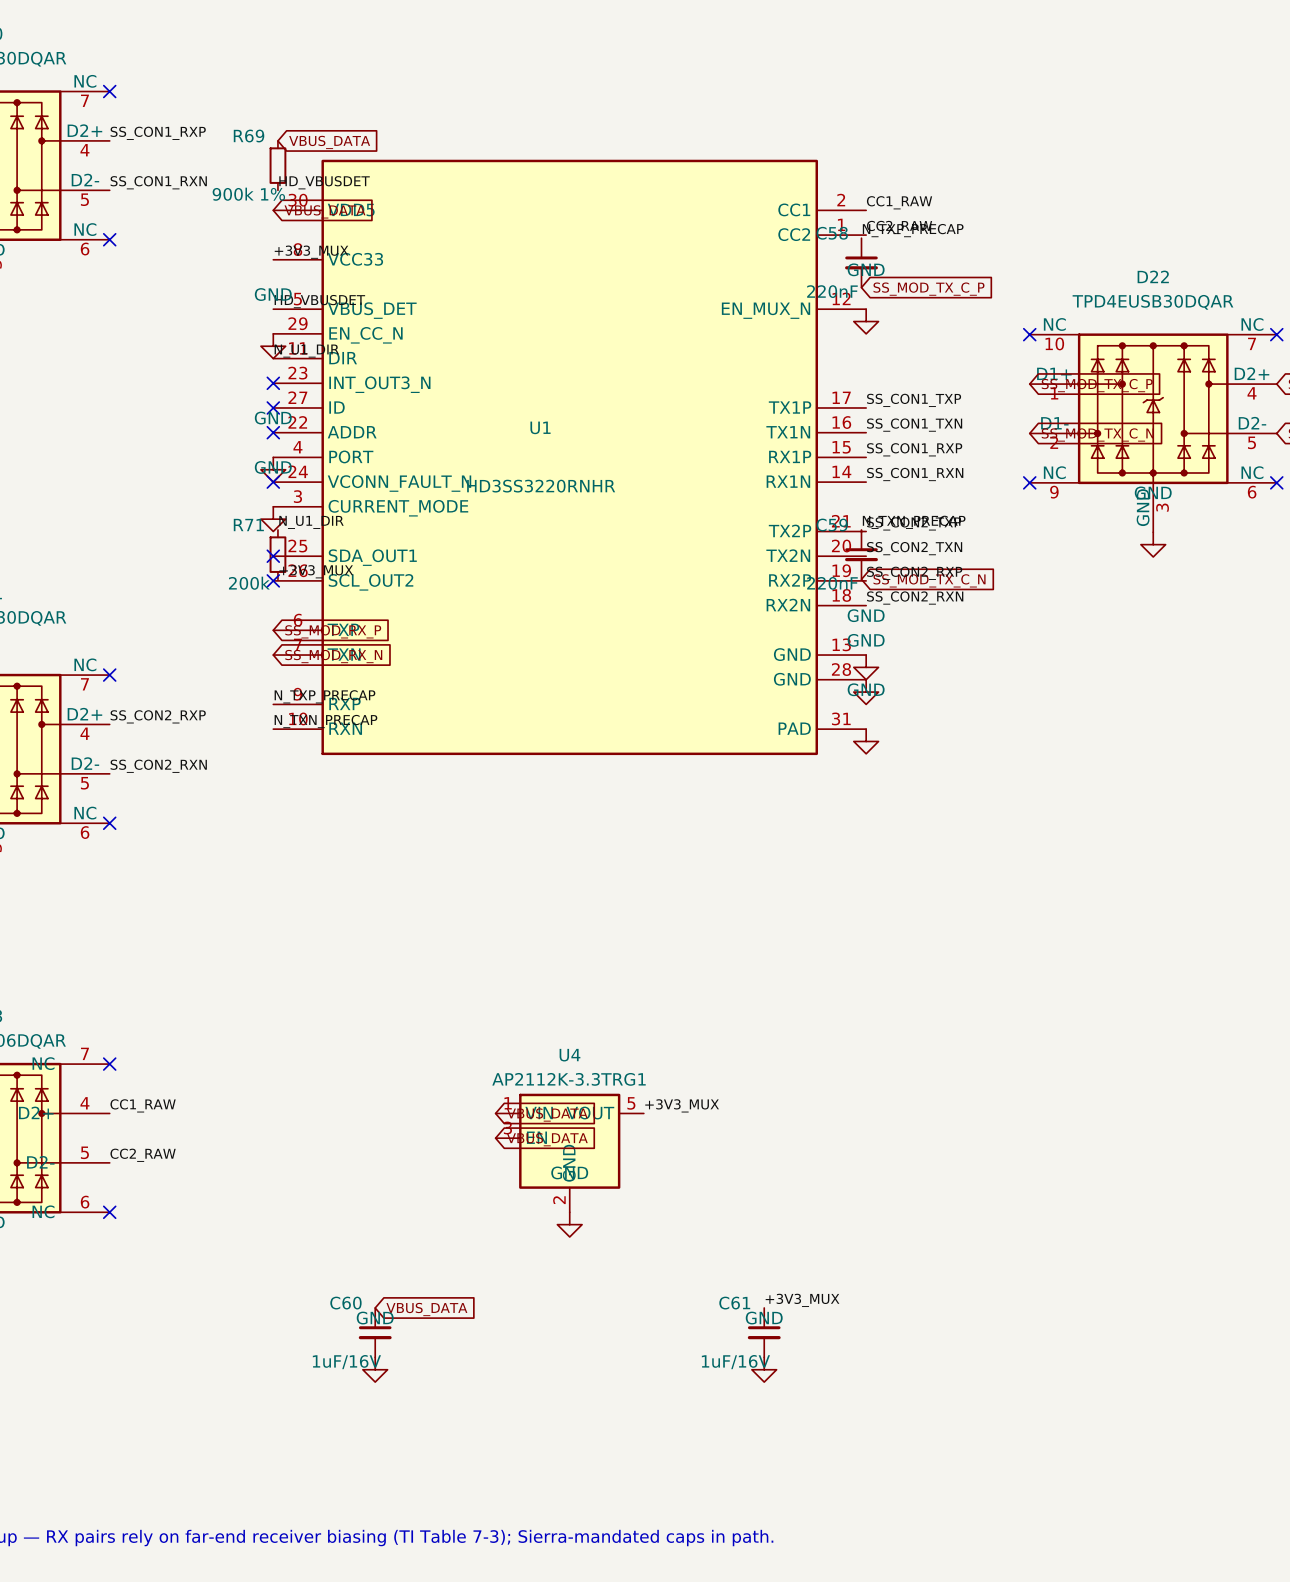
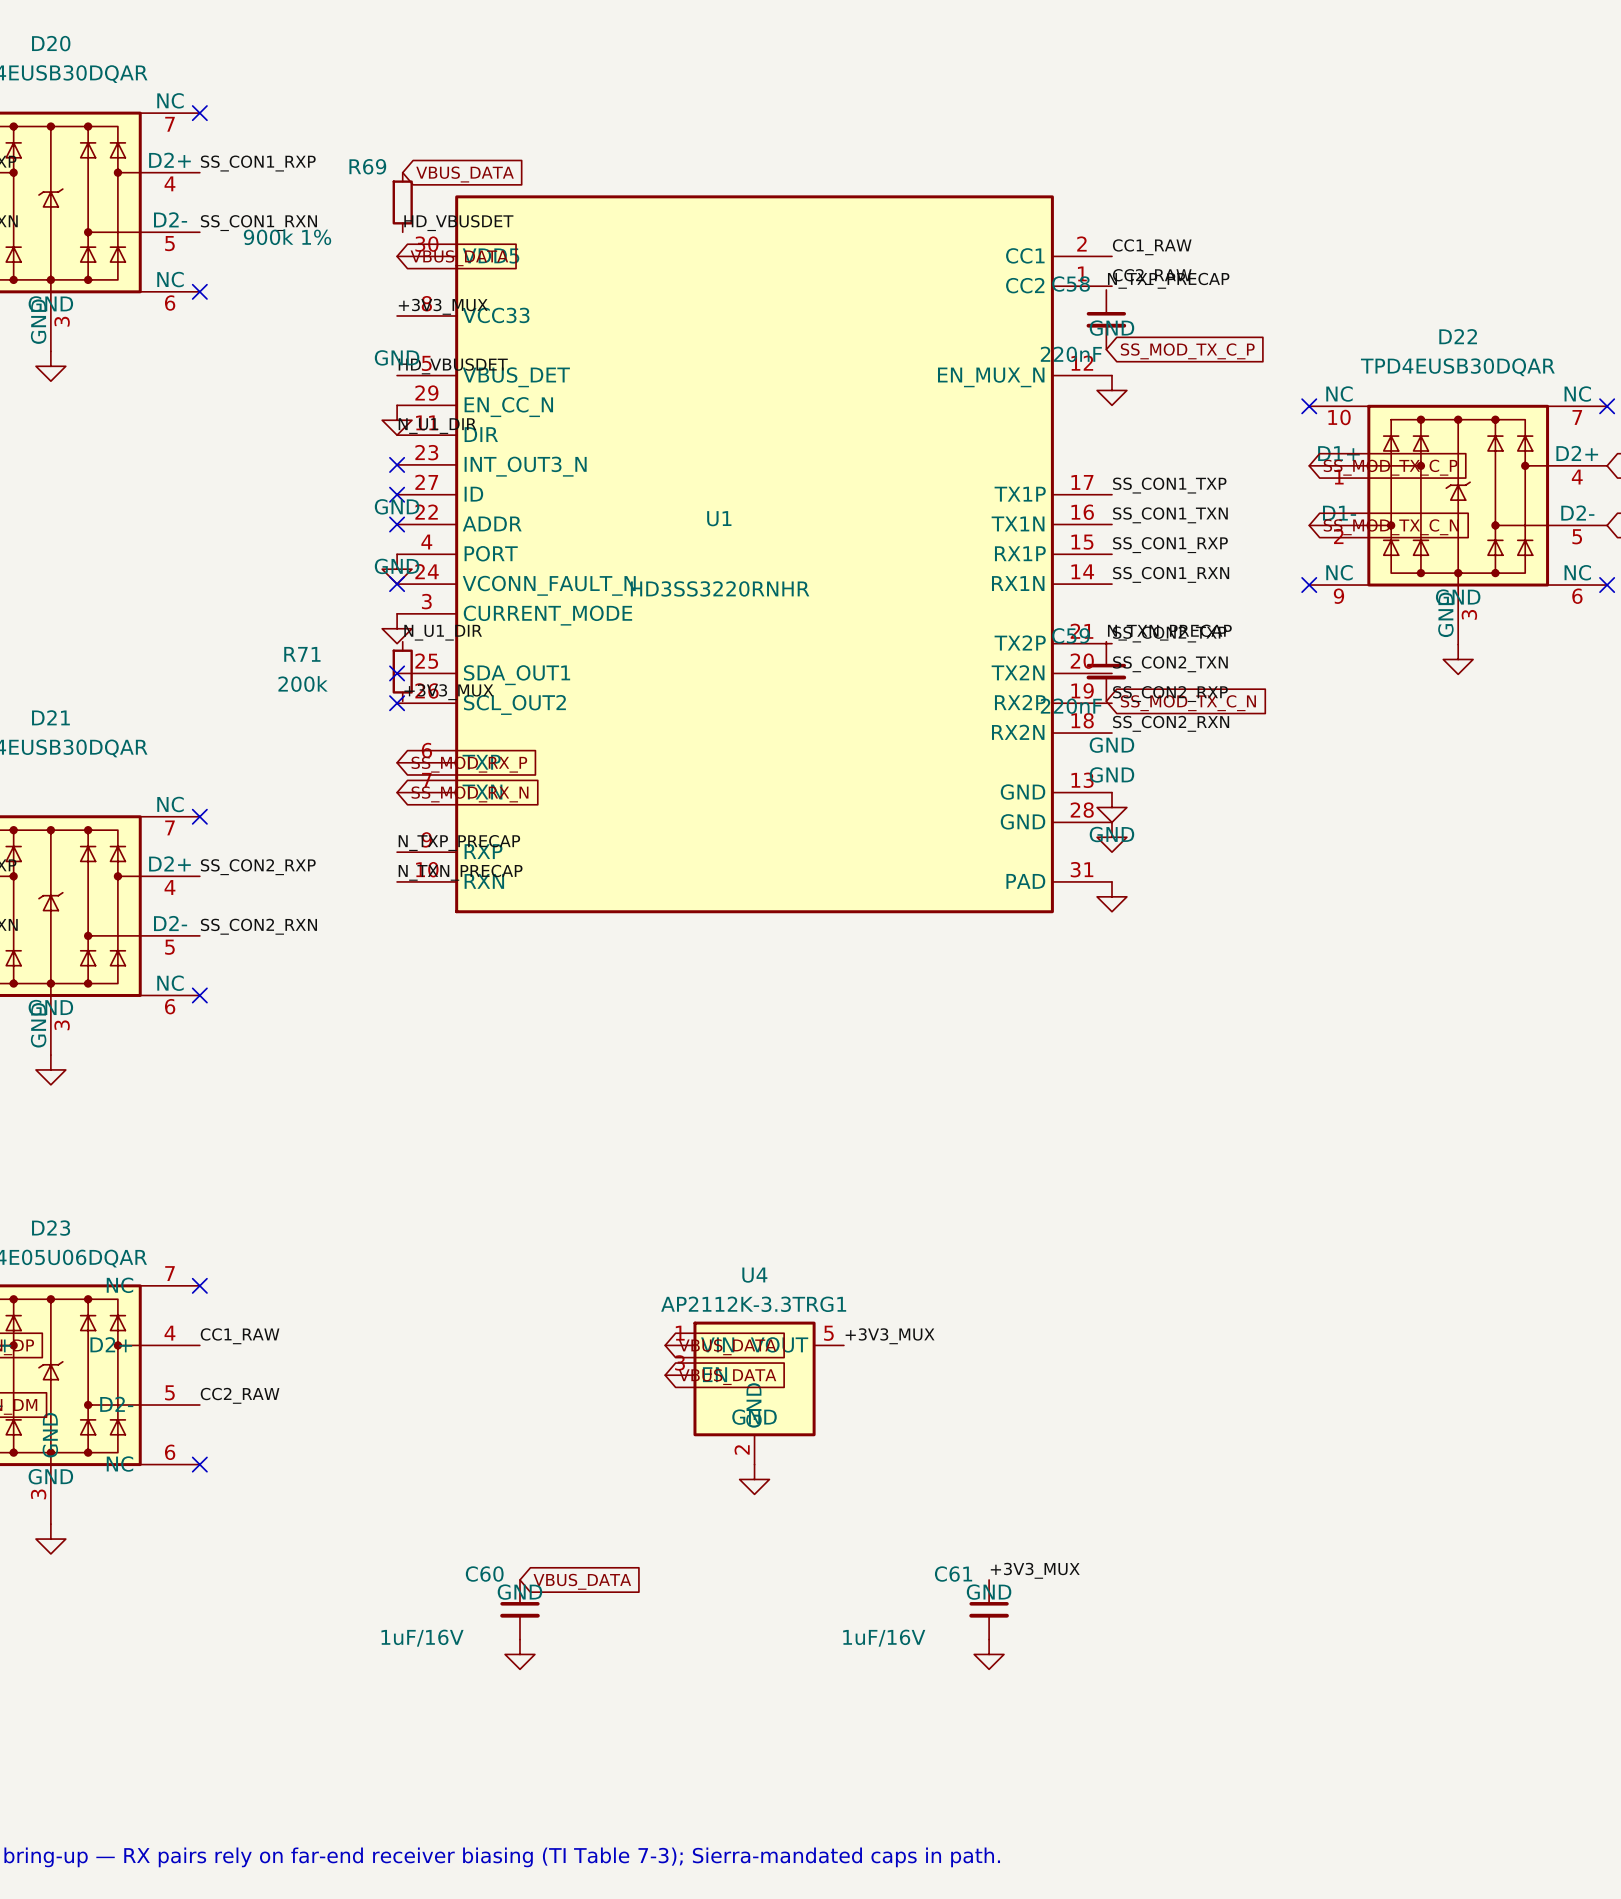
R69 value position: 900k 1% (248, 194) -> 900k 1% (287, 237)
R71 name position: R71 (248, 525) -> R71 (302, 654)
R71 value position: 200k (249, 583) -> 200k (303, 683)
C60 value position: 1uF/16V (346, 1362) -> 1uF/16V (422, 1638)
C61 value position: 1uF/16V (735, 1362) -> 1uF/16V (884, 1638)

